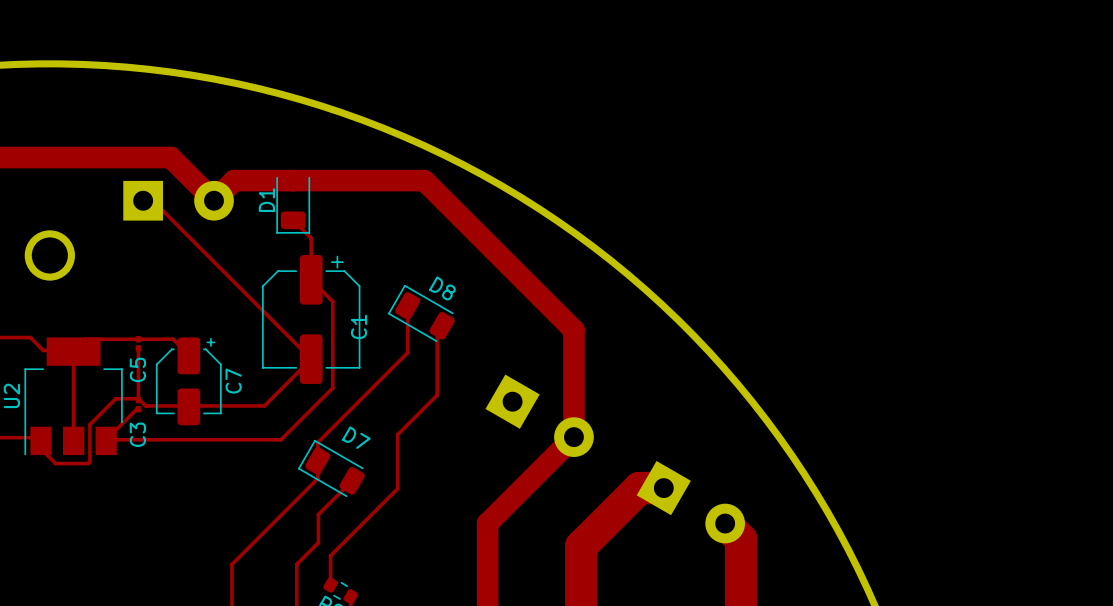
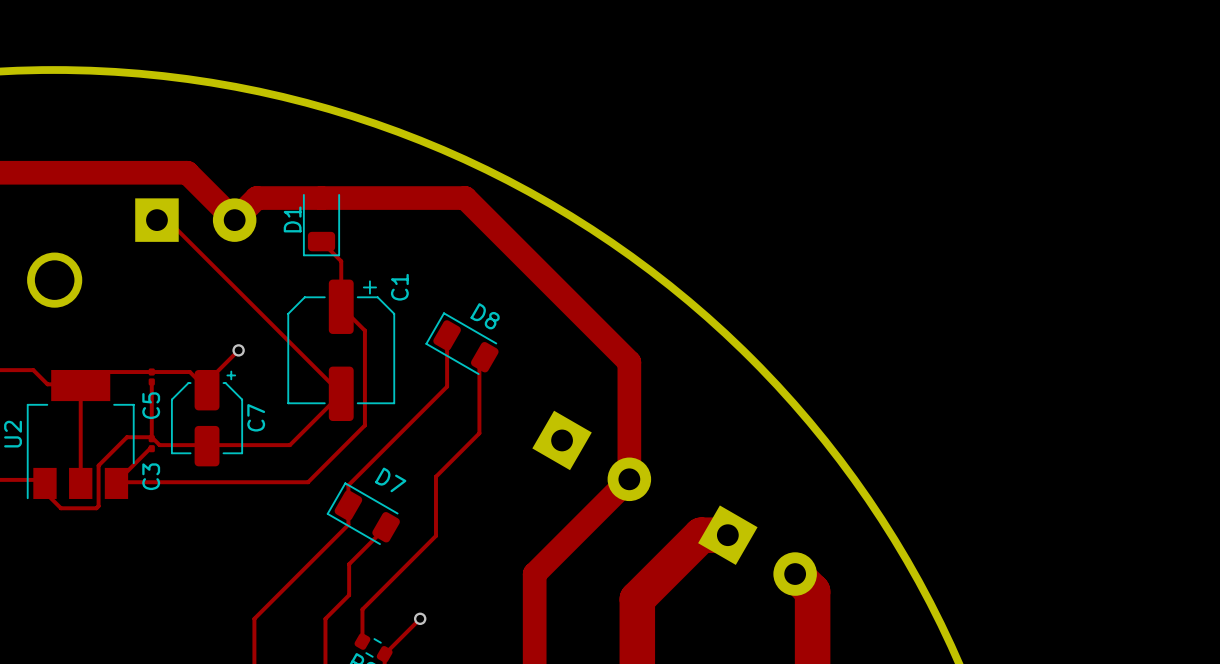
track: none -> (238, 350) (207, 381) (207, 390)
via: none -> (238, 350)
C1 name position: C1 (359, 327) -> C1 (399, 287)
track: none -> (420, 618) (384, 654)
via: none -> (420, 618)

